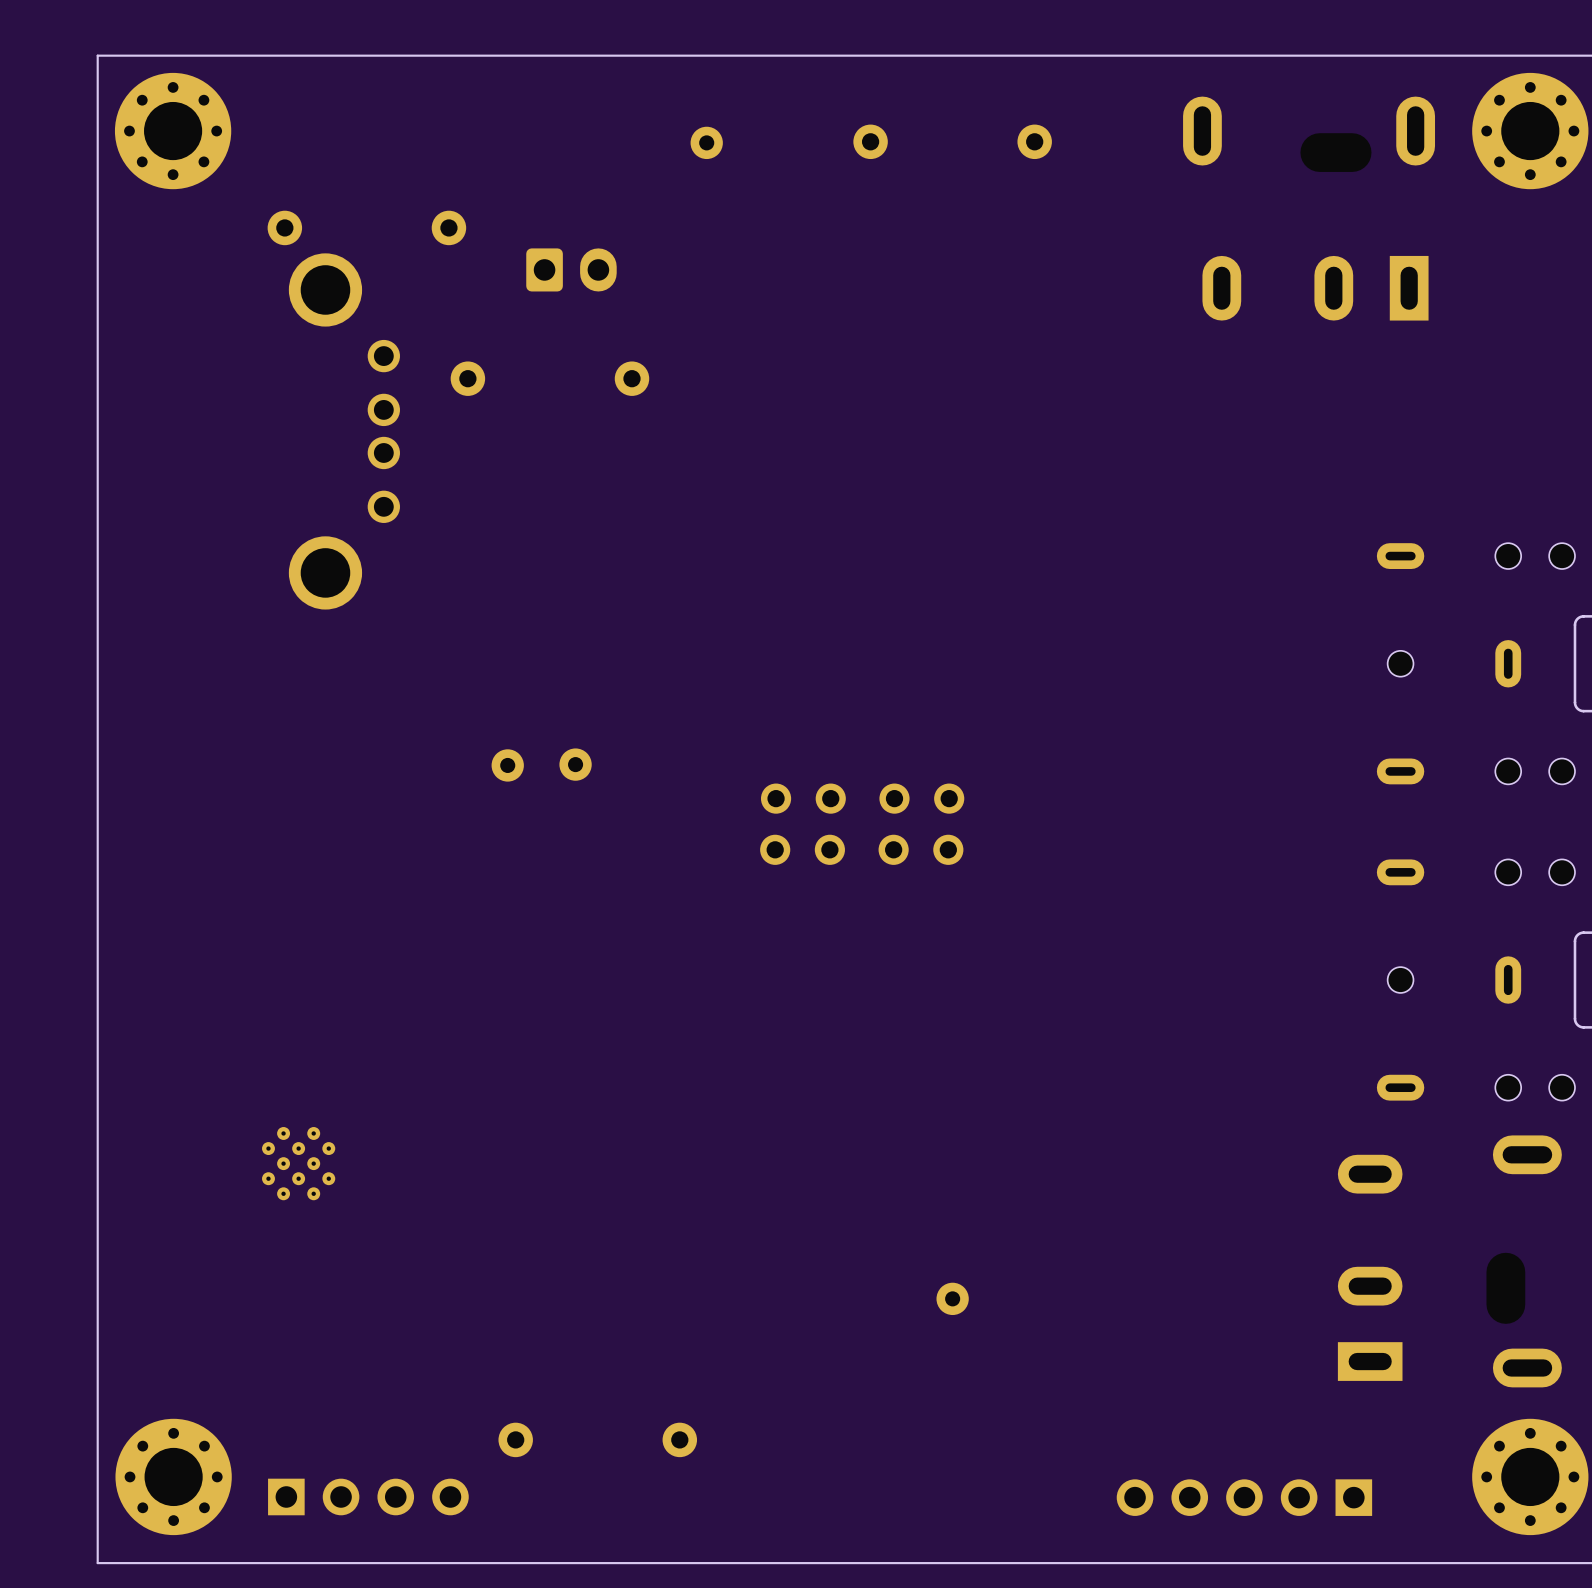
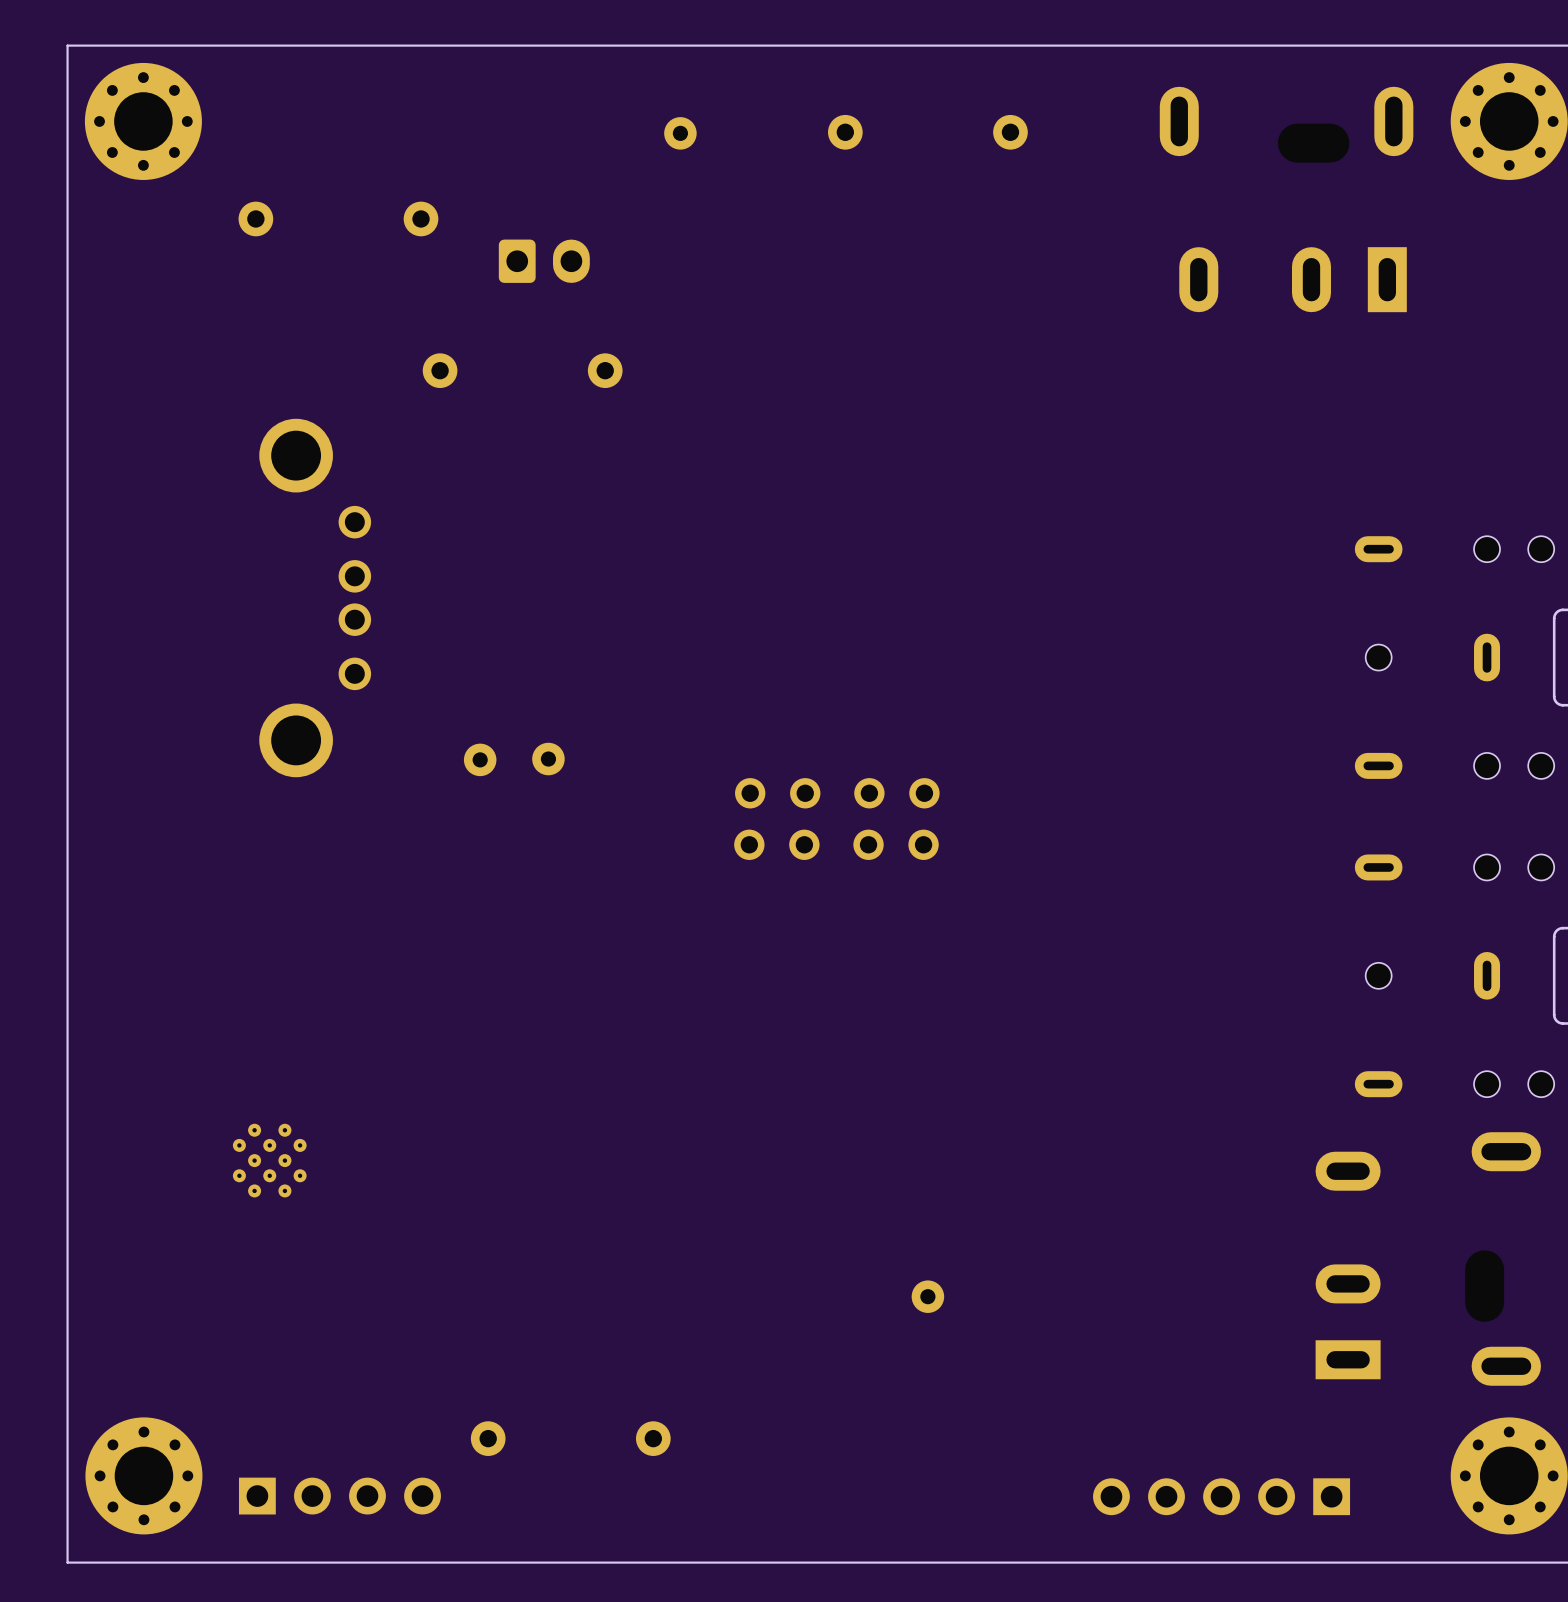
part position: (344, 431) -> (315, 598)

